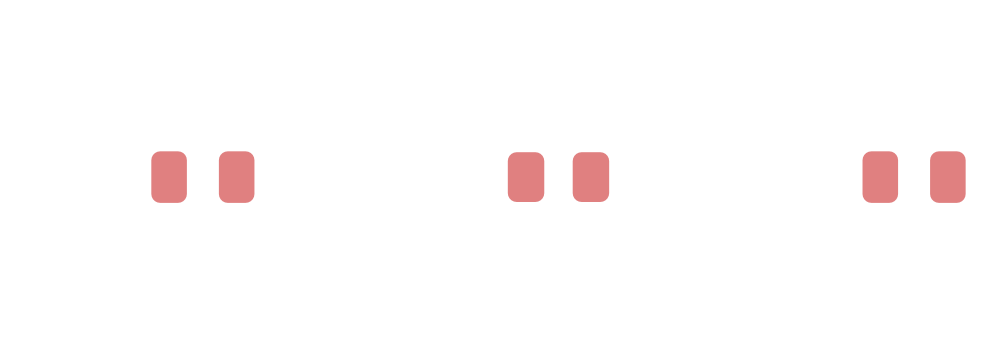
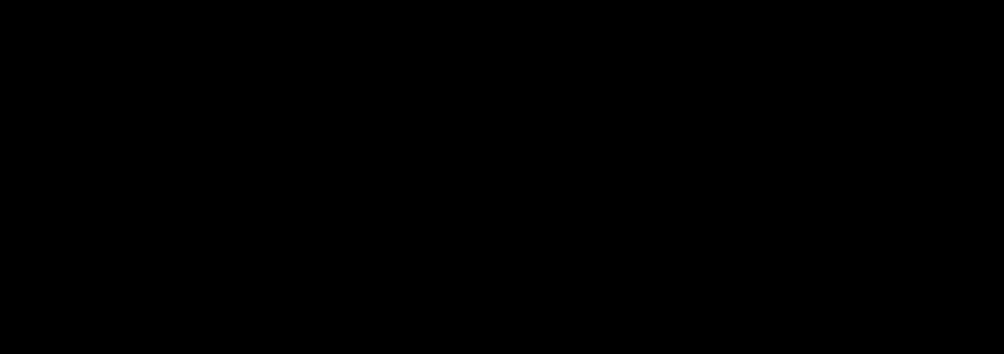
part: (202, 177) -> none
part: (558, 177) -> none
part: (914, 177) -> none

